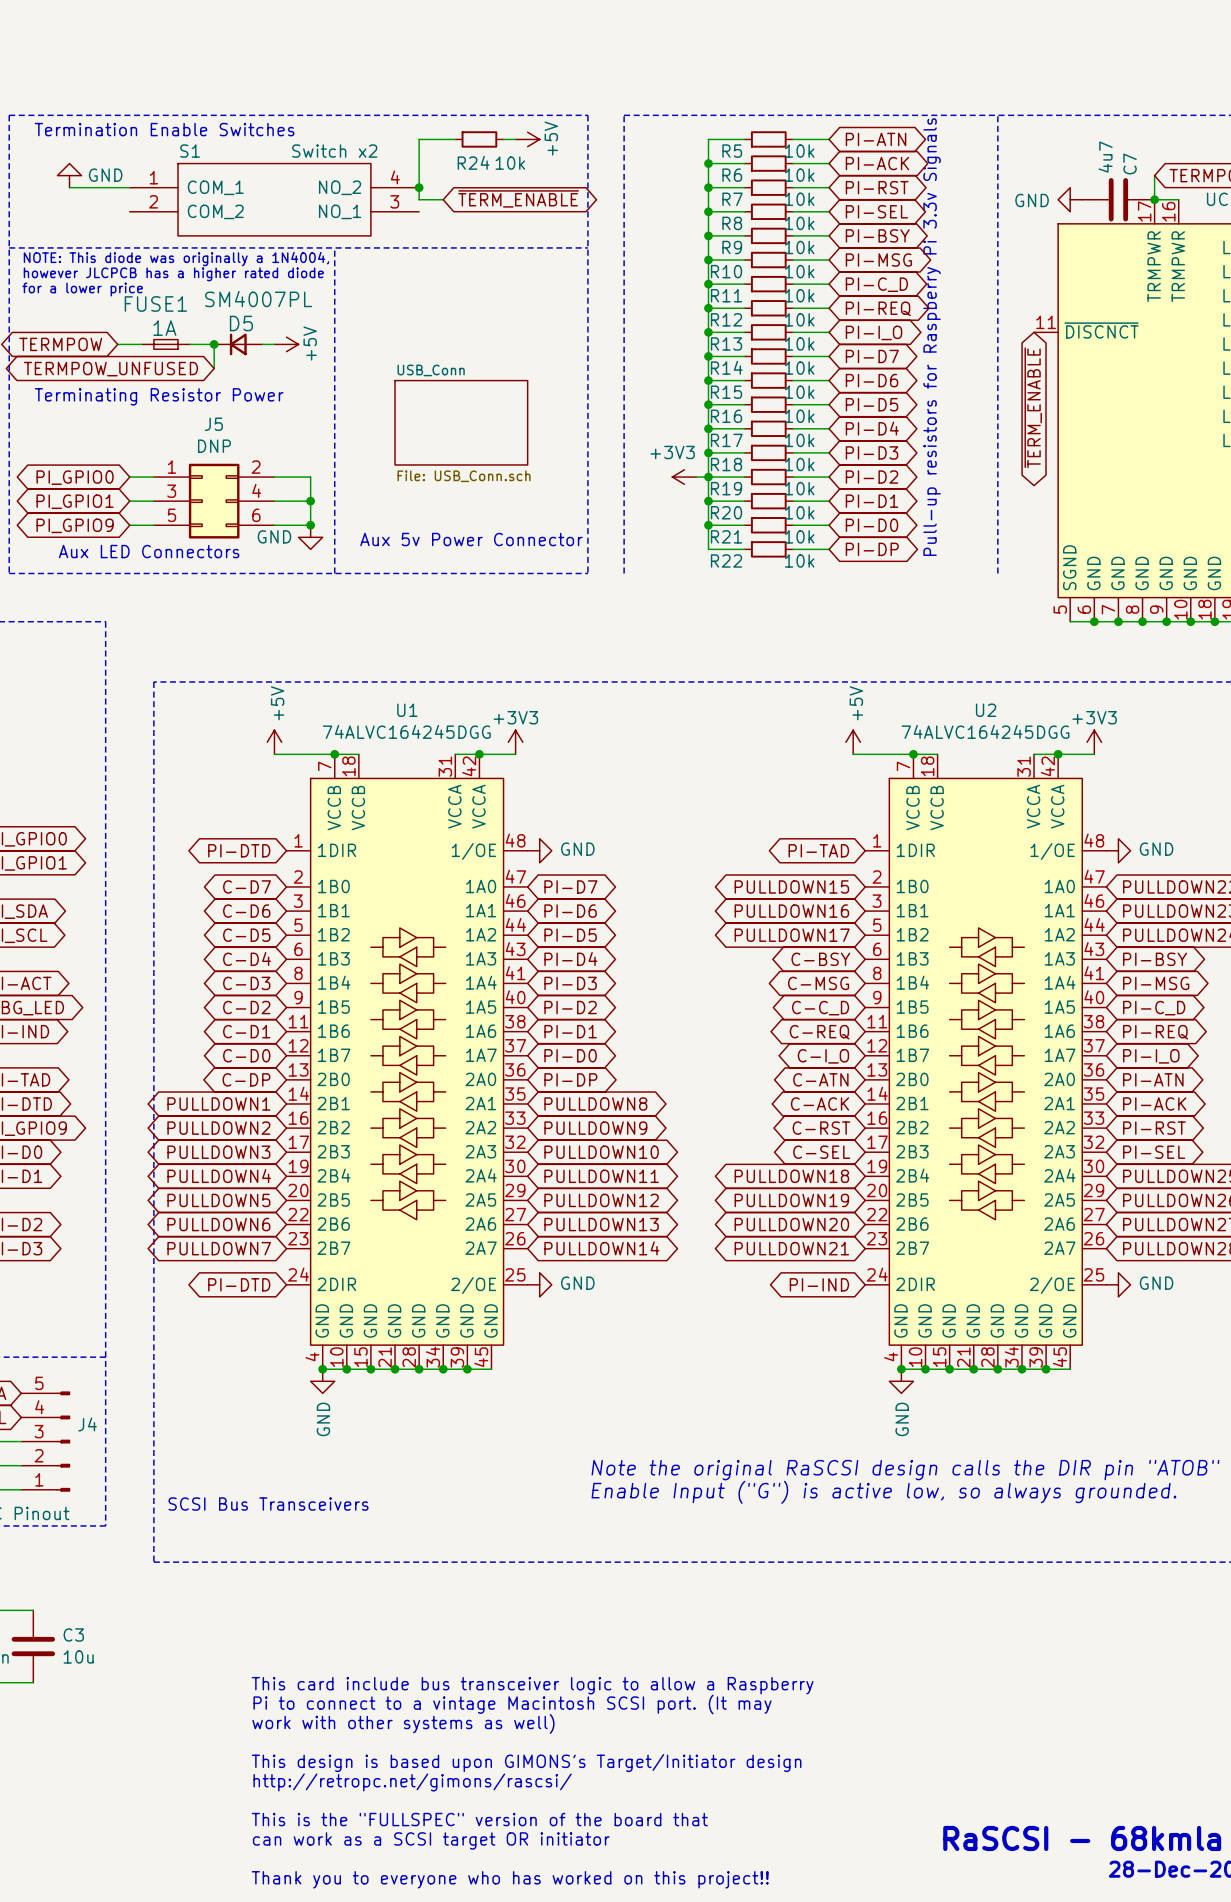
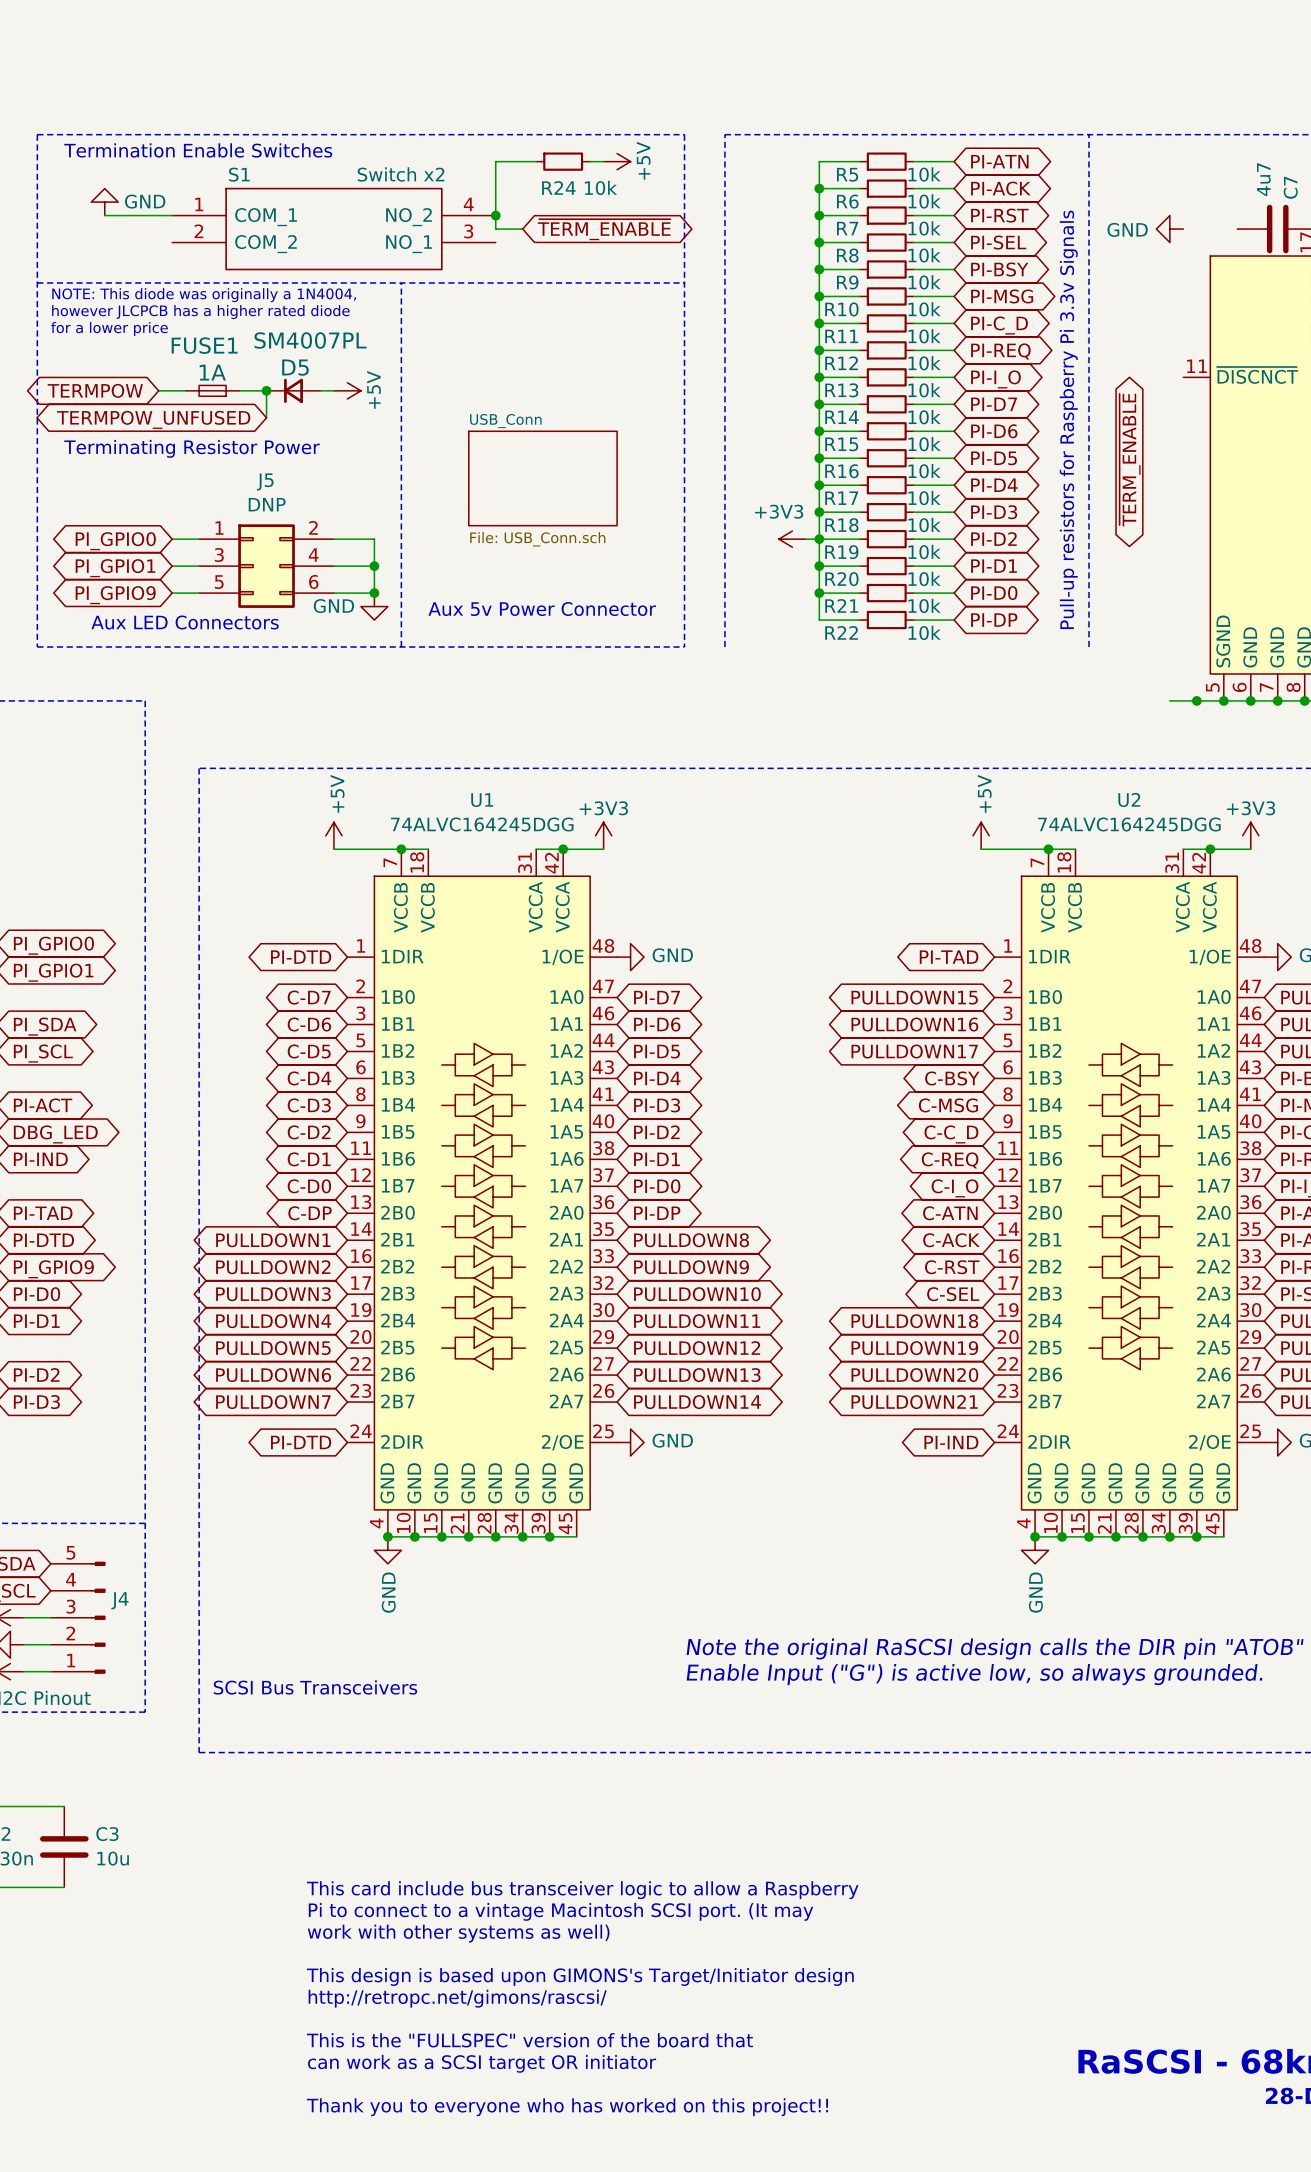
line: (997, 115) (997, 573) -> (1088, 134) (1088, 647)
power symbol position: GND (1070, 199) -> GND (1169, 229)
global label position: ~{TERM_ENABLE} (1033, 407) -> ~{TERM_ENABLE} (1130, 460)
wire: none -> (1169, 700) (1223, 700)
junction: none -> (1196, 700)
junction: none -> (1223, 700)

